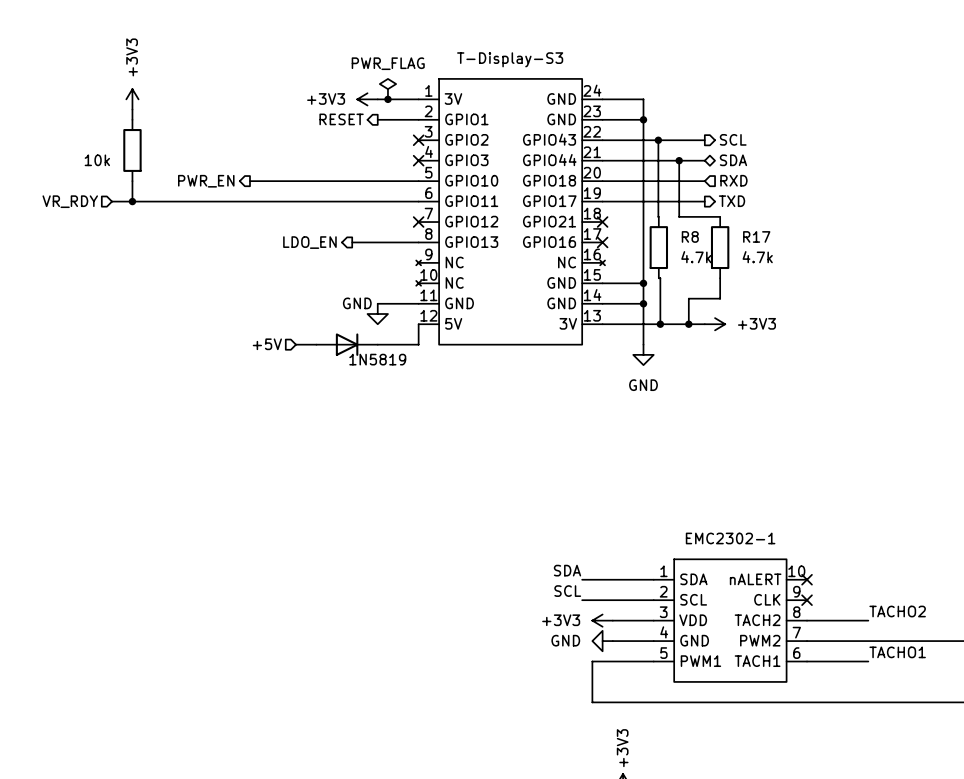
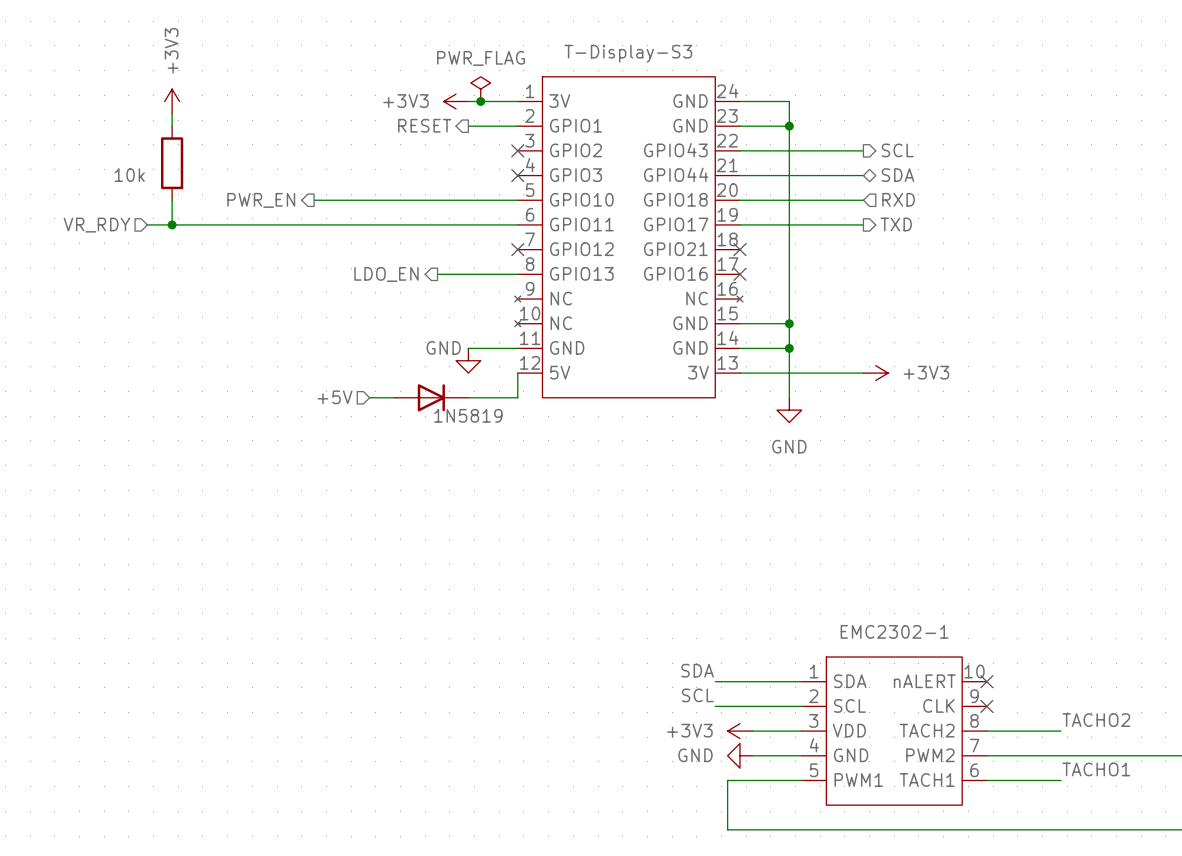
wire: (658, 140) (658, 216) -> none
junction: (658, 140) -> none
wire: (679, 160) (679, 216) (720, 216) -> none
junction: (679, 160) -> none
R8: 4.7k (658, 247) -> none
R17: 4.7k (720, 247) -> none
wire: (658, 278) (660, 278) (660, 324) -> none
wire: (720, 278) (720, 298) (688, 298) (688, 324) -> none
junction: (660, 324) -> none
junction: (688, 324) -> none

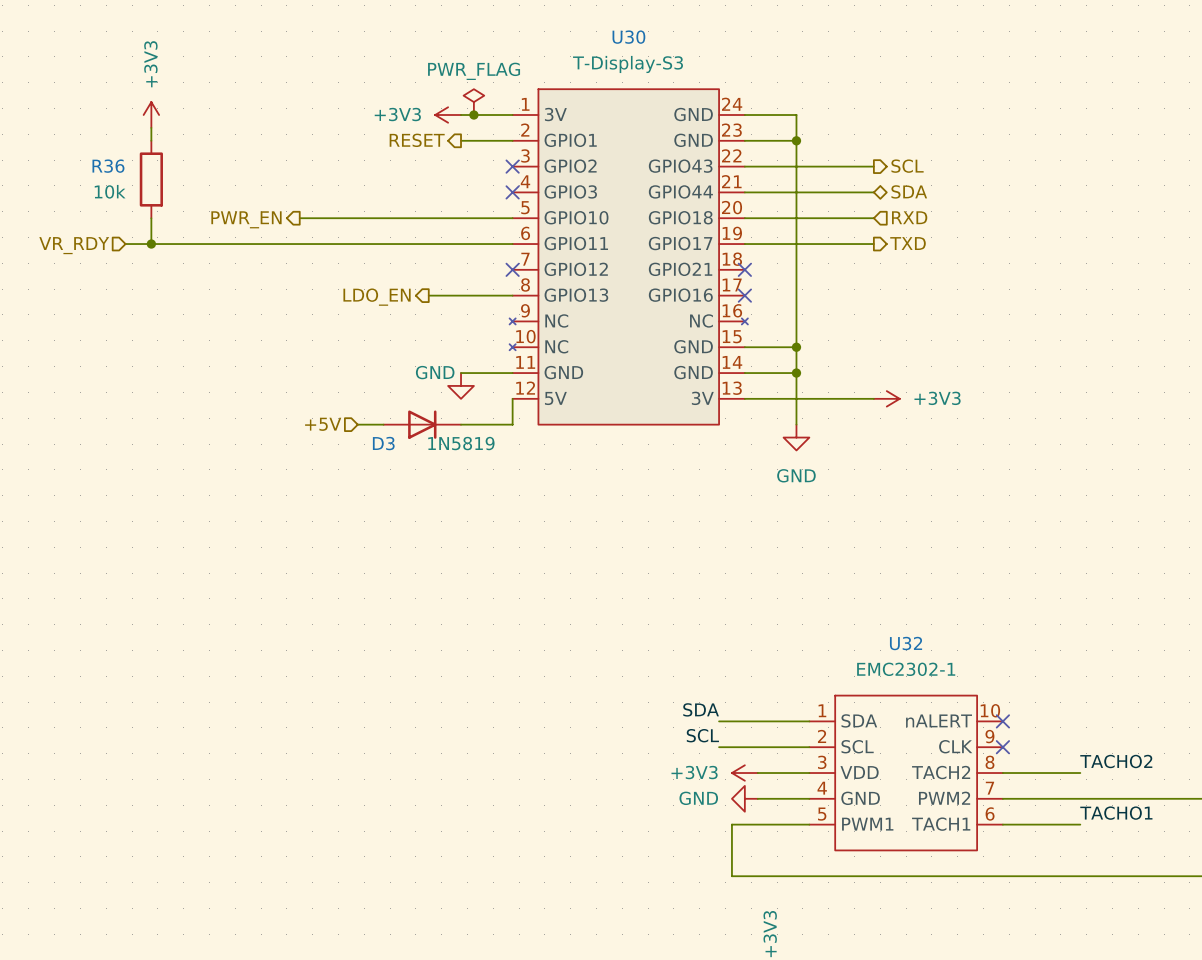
U30 name: none -> U30 (628, 37)
R36 name: none -> R36 (108, 166)
D3 name: none -> D3 (383, 443)
U32 name: none -> U32 (906, 643)

